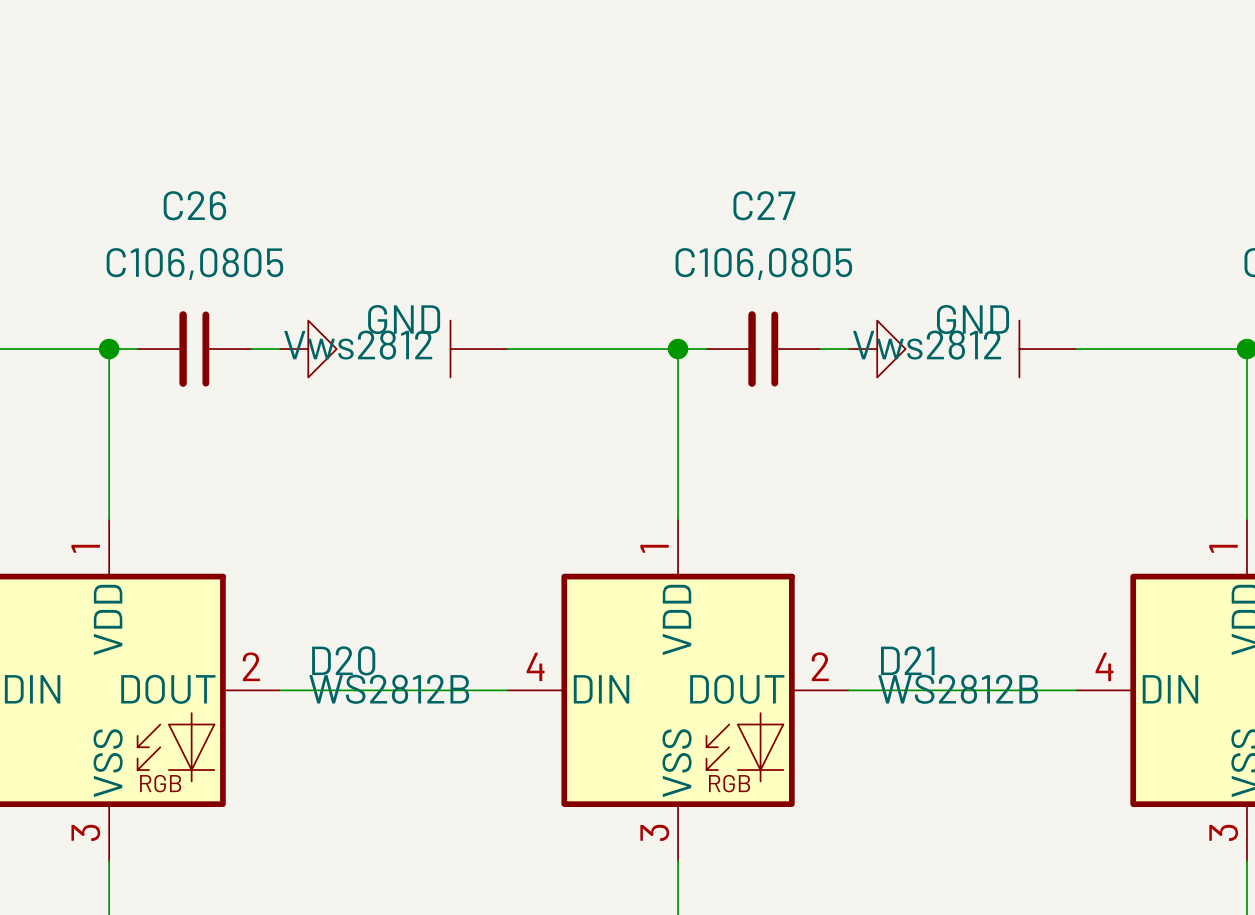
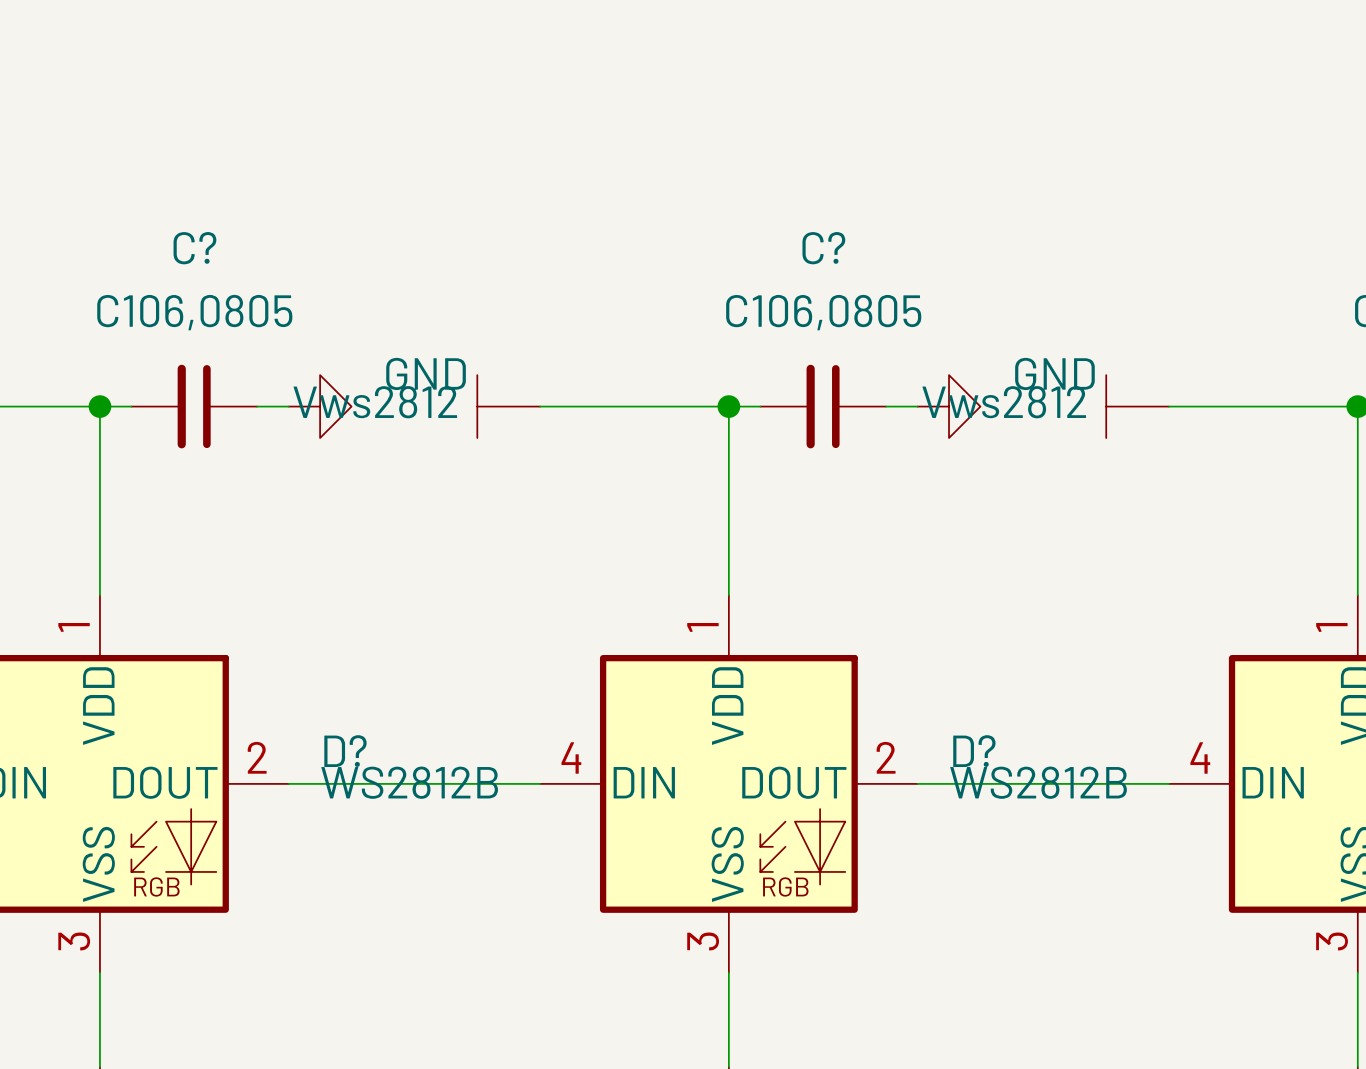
C26 name: C26 (194, 205) -> C? (194, 248)
C27 name: C27 (764, 205) -> C? (823, 248)
D20 name: D20 (343, 660) -> D? (345, 751)
D21 name: D21 (907, 660) -> D? (974, 751)

